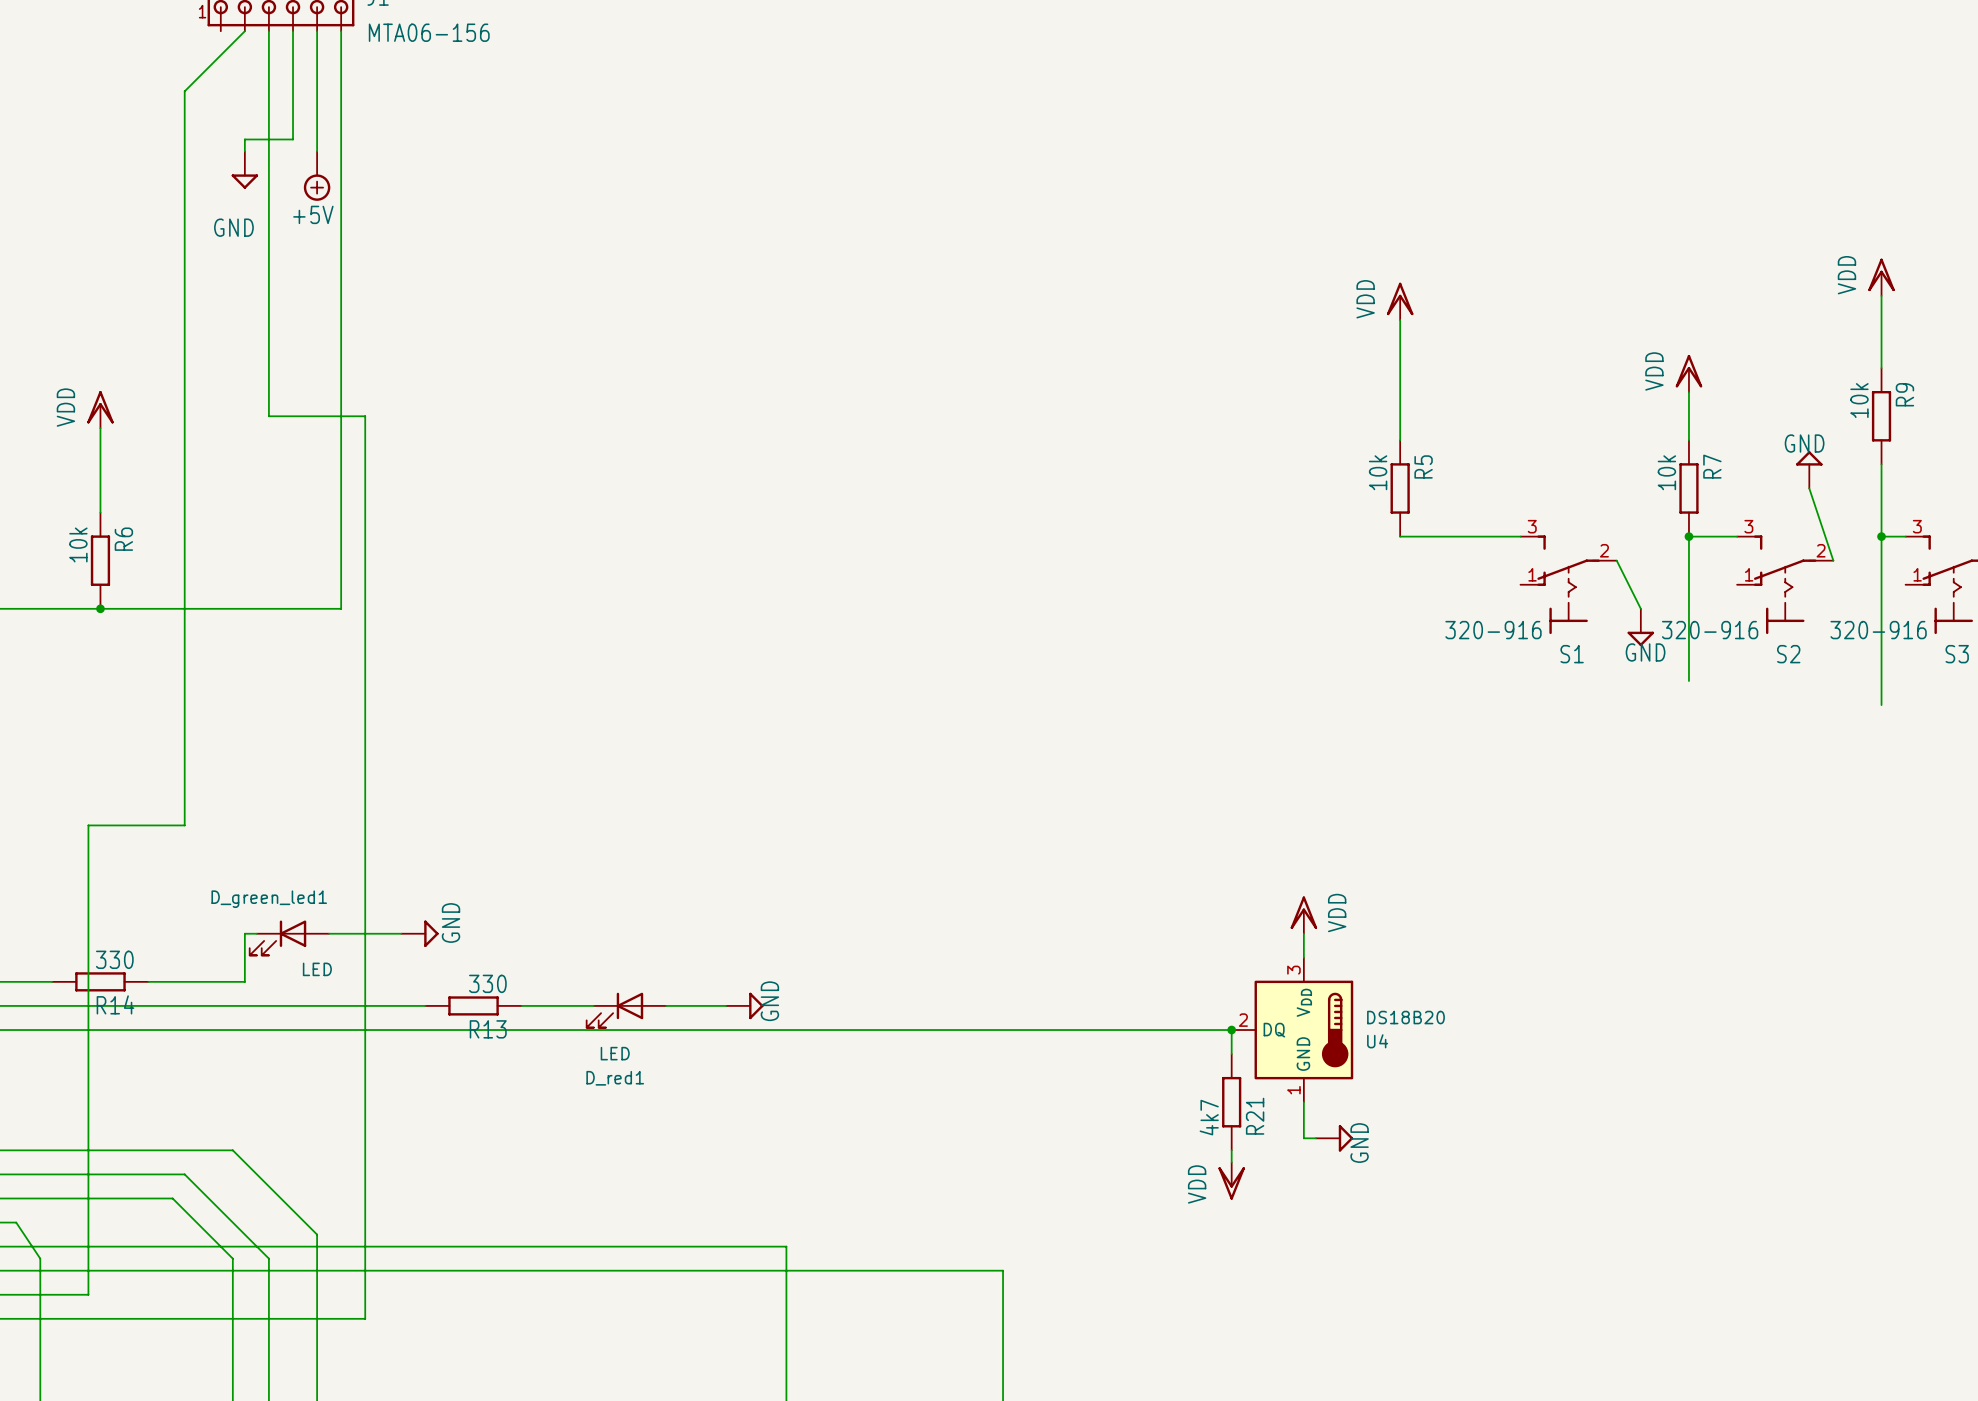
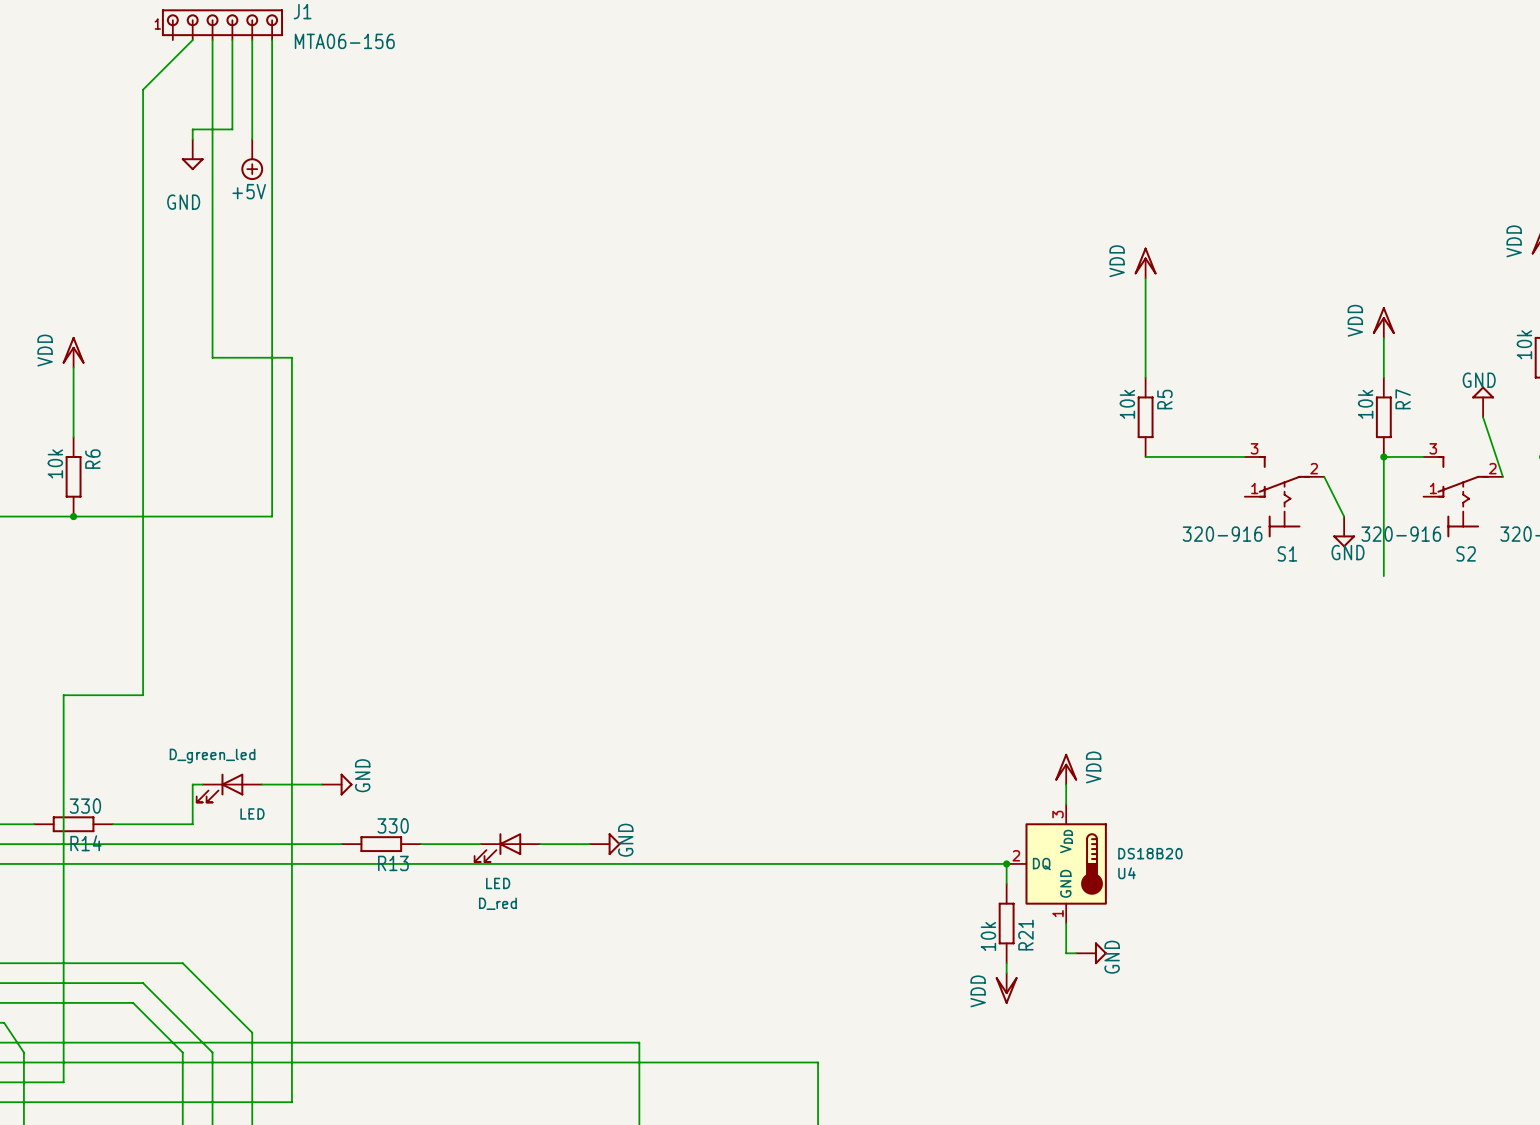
D_green_led1 name: D_green_led1 (269, 899) -> D_green_led (212, 756)
D_red1 name: D_red1 (615, 1078) -> D_red (497, 903)
R21 value: 4k7 (1209, 1117) -> 10k (988, 936)

